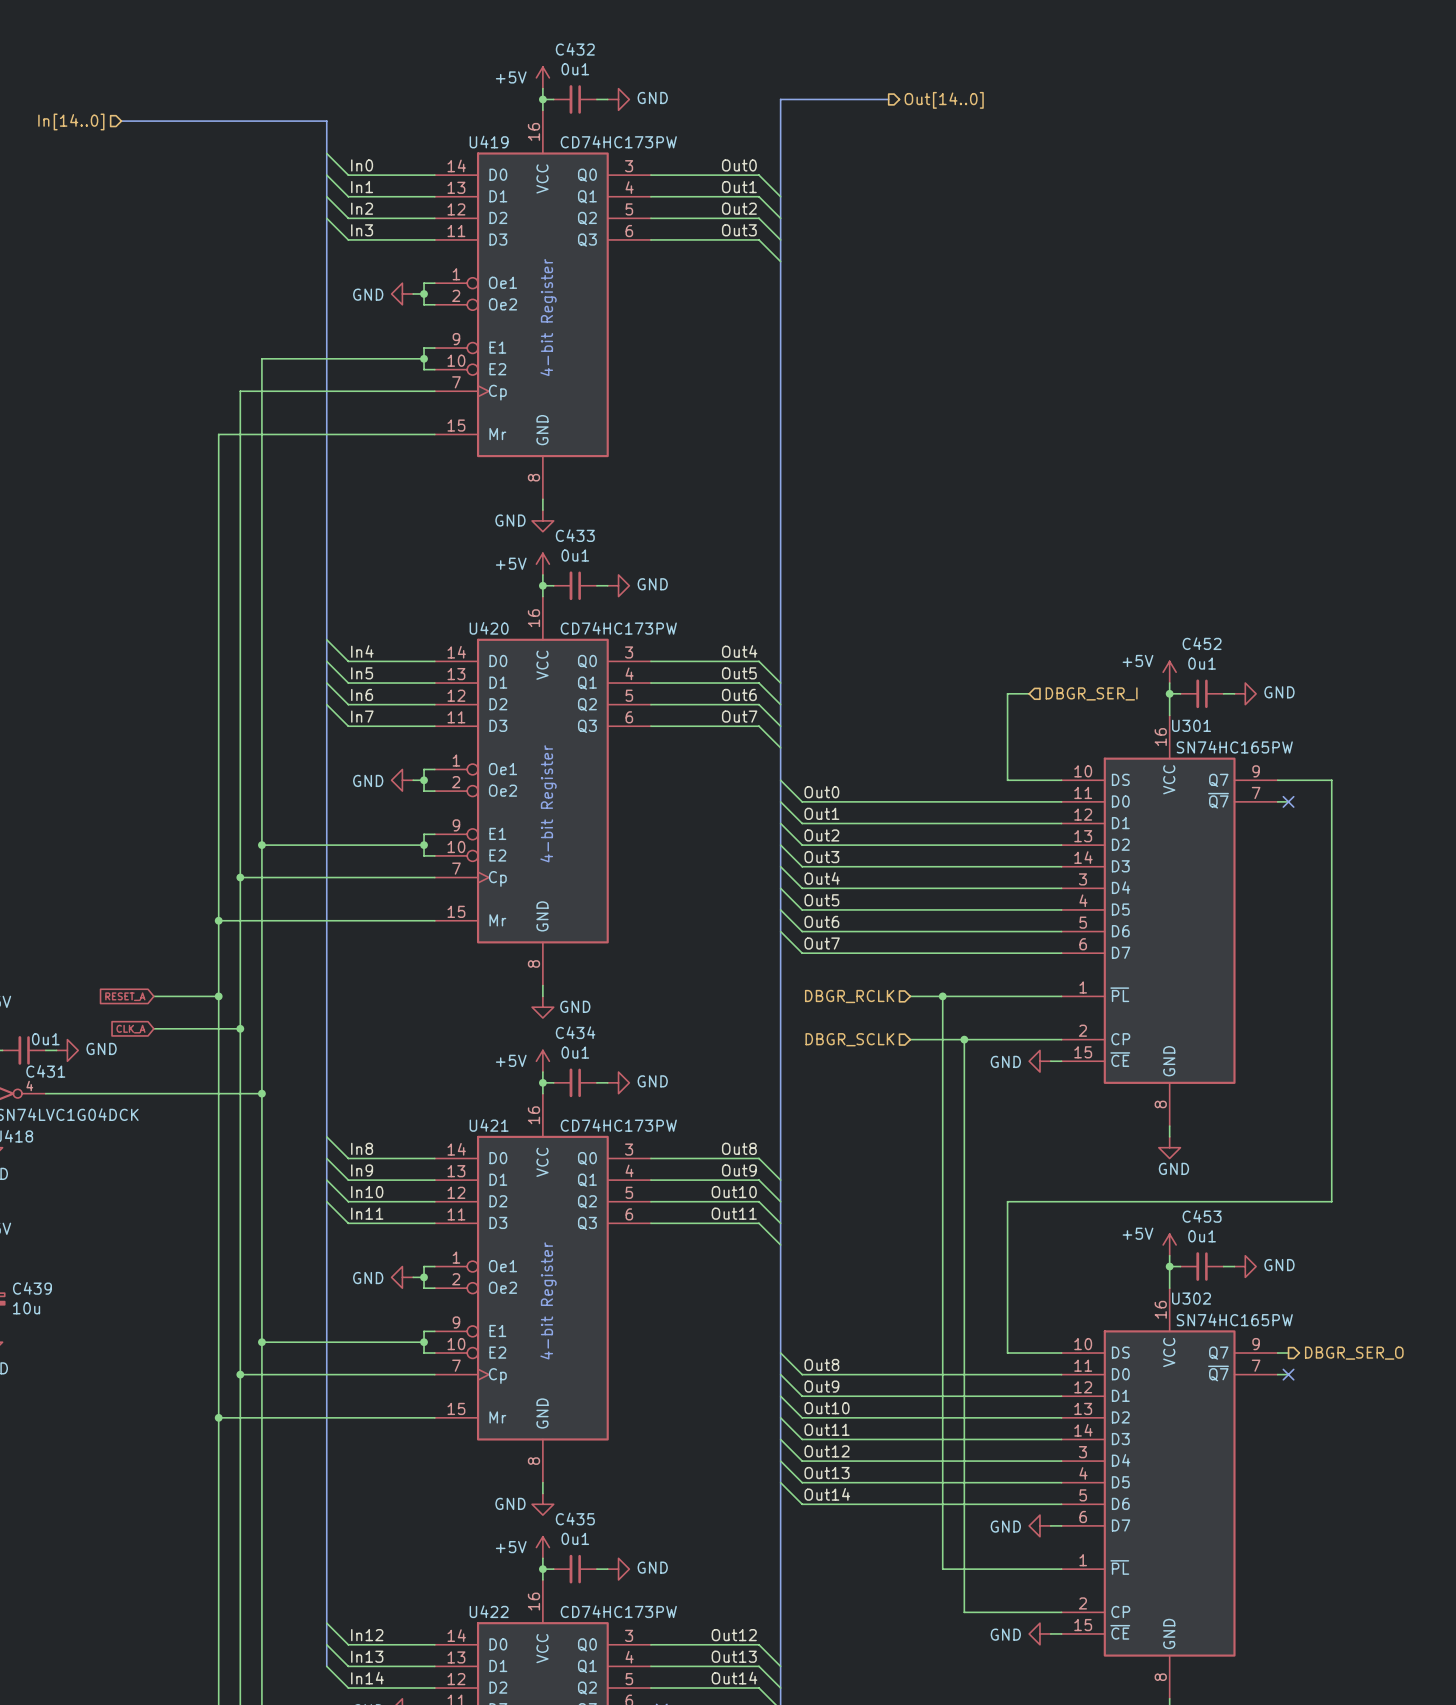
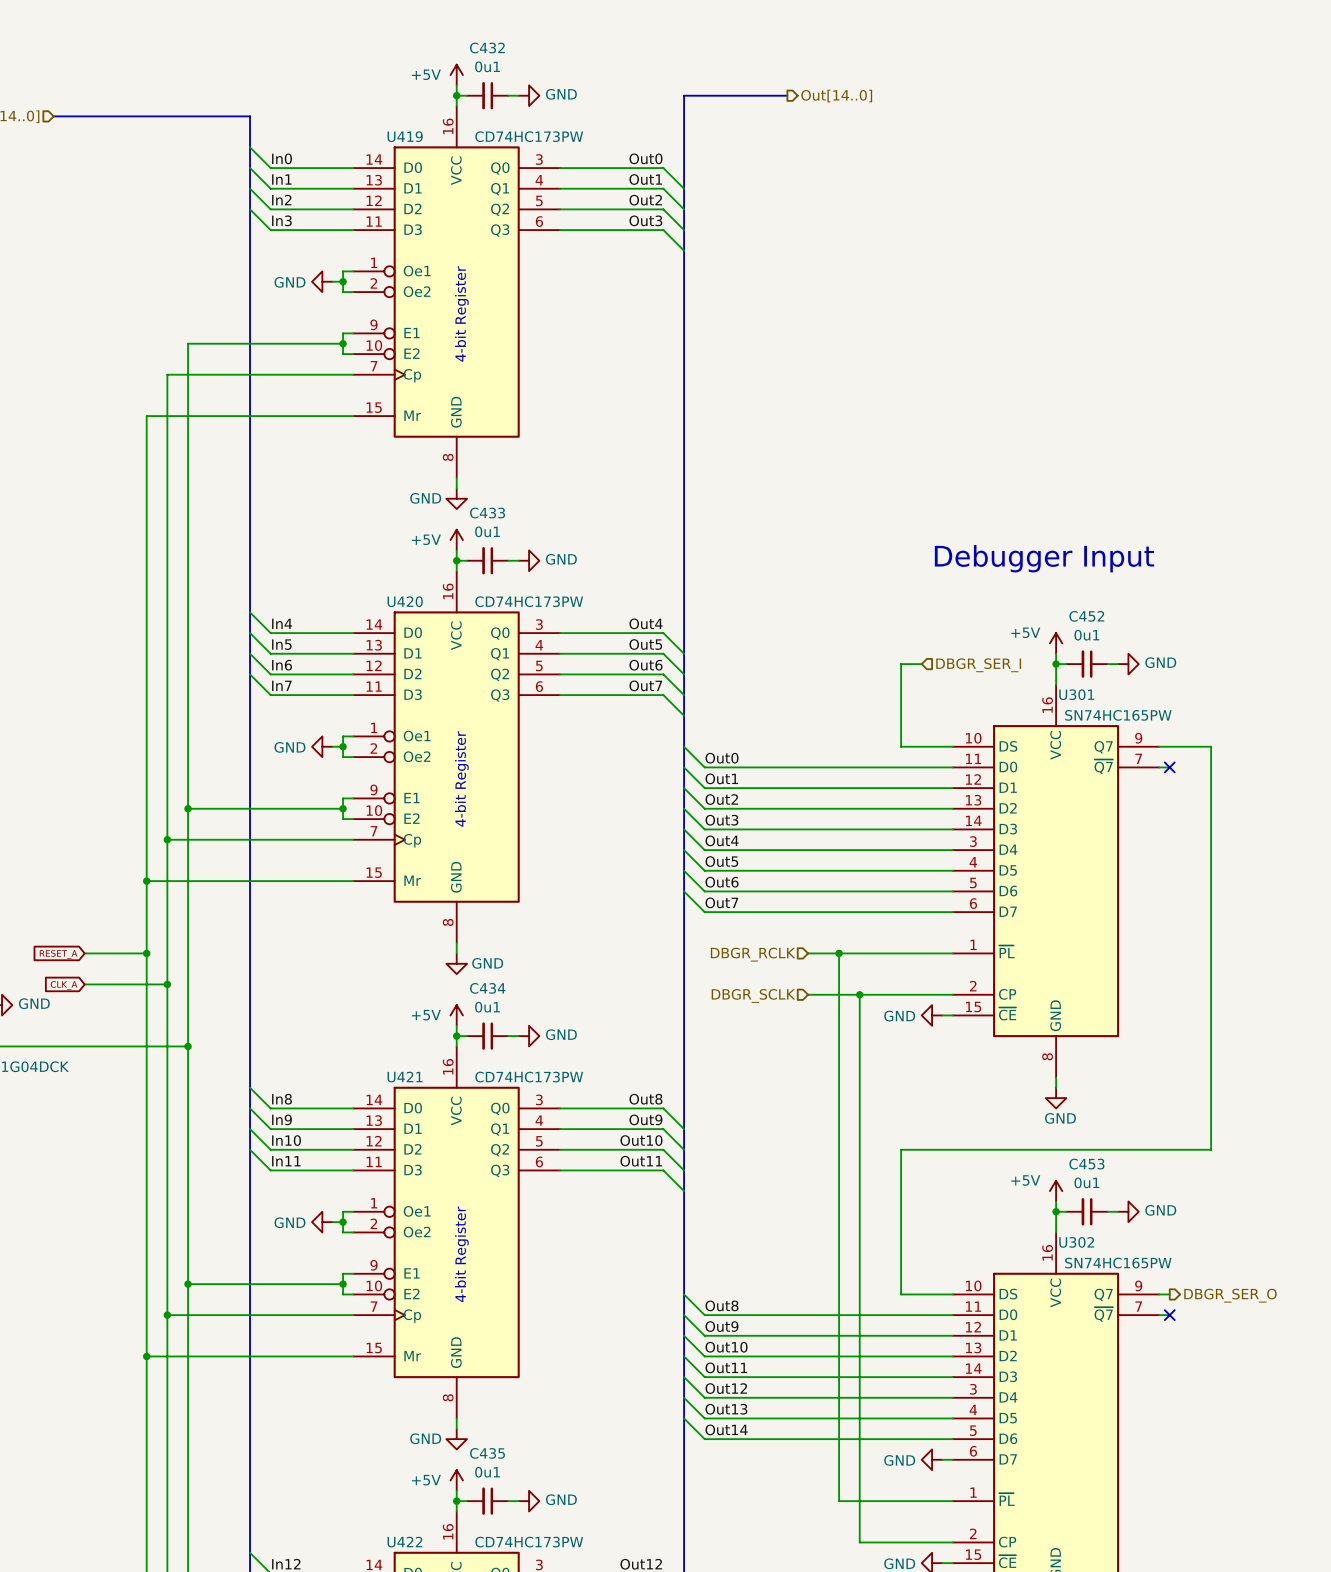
text: none -> Debugger Input (1044, 558)

